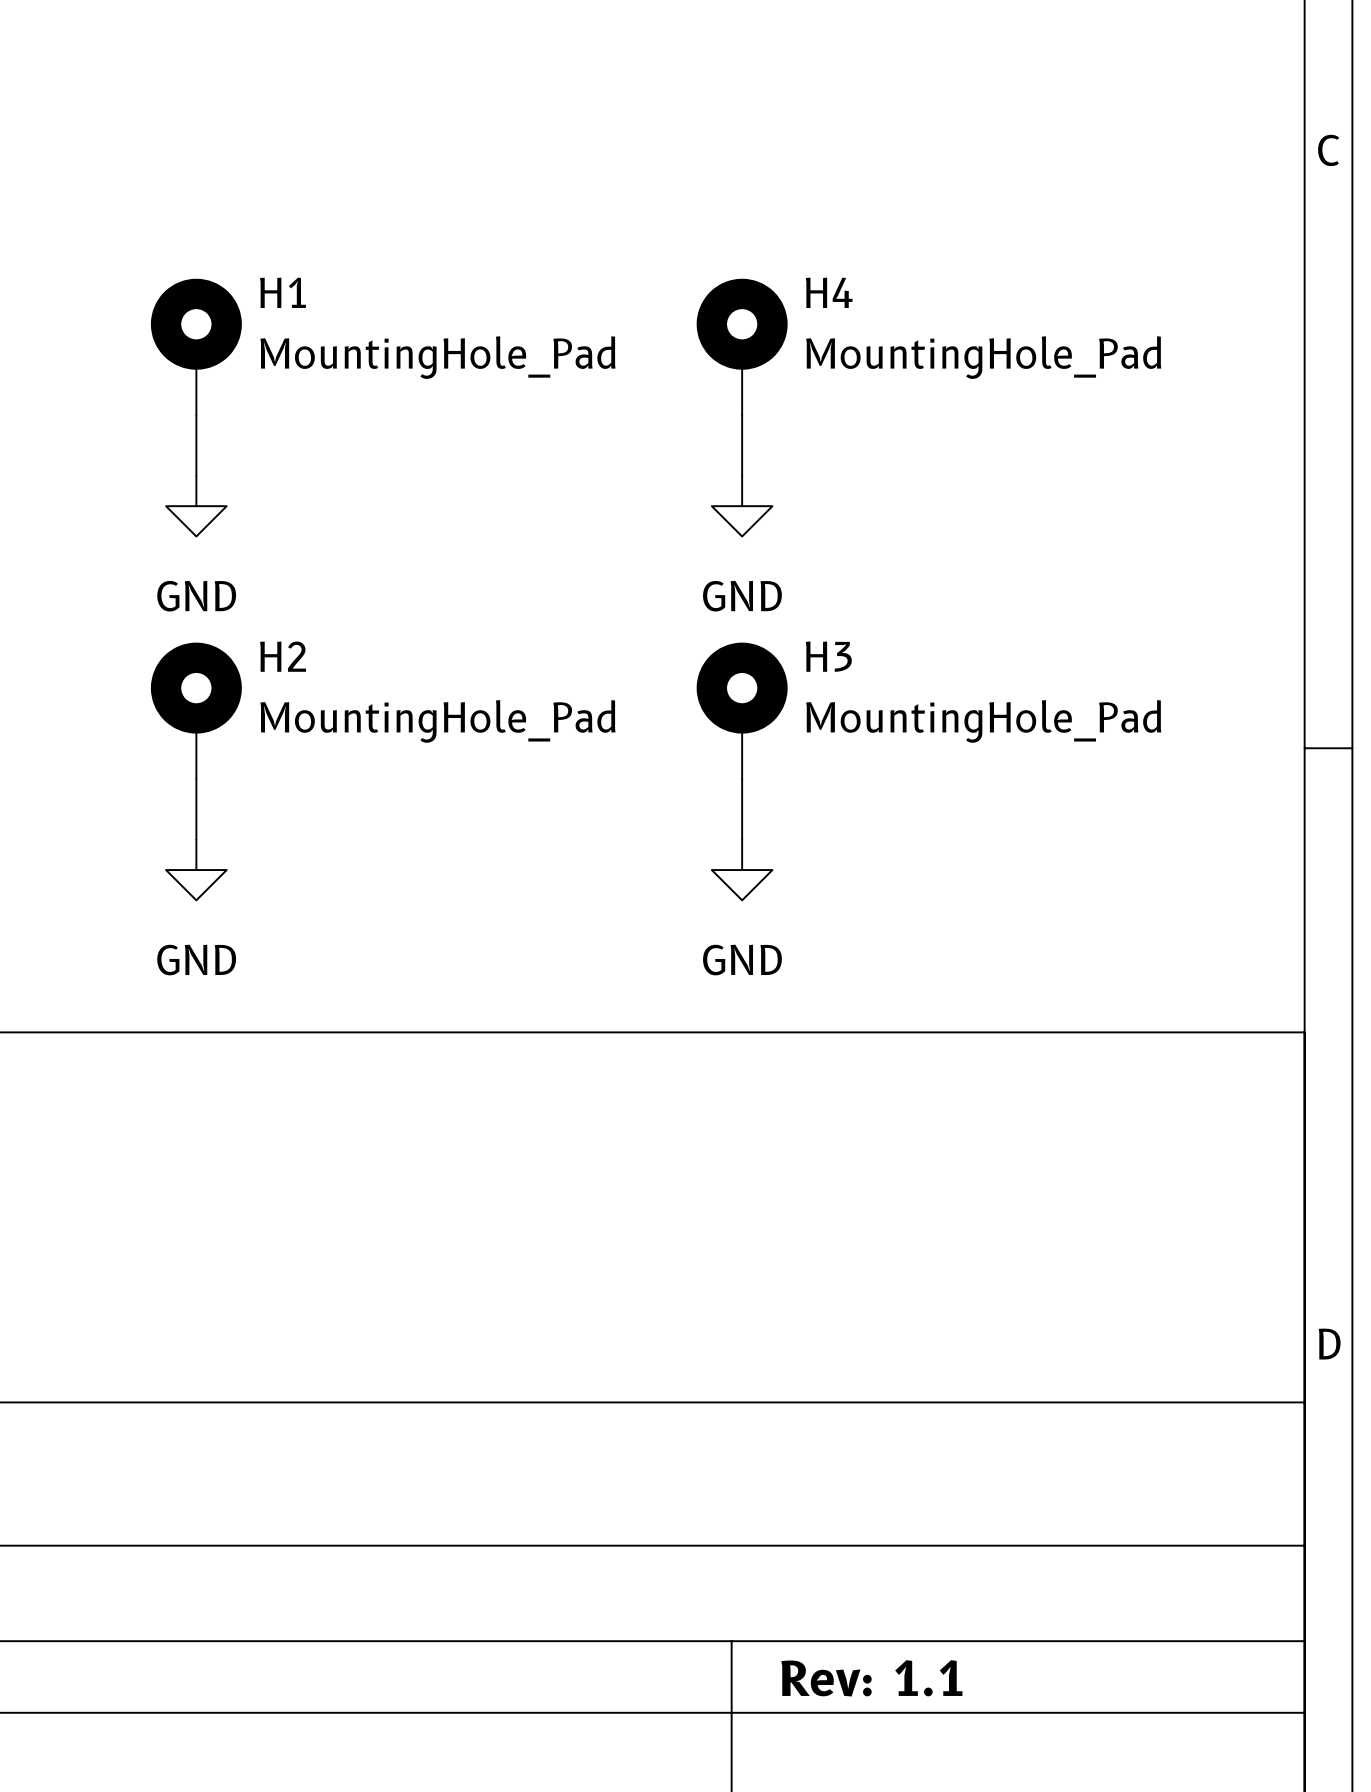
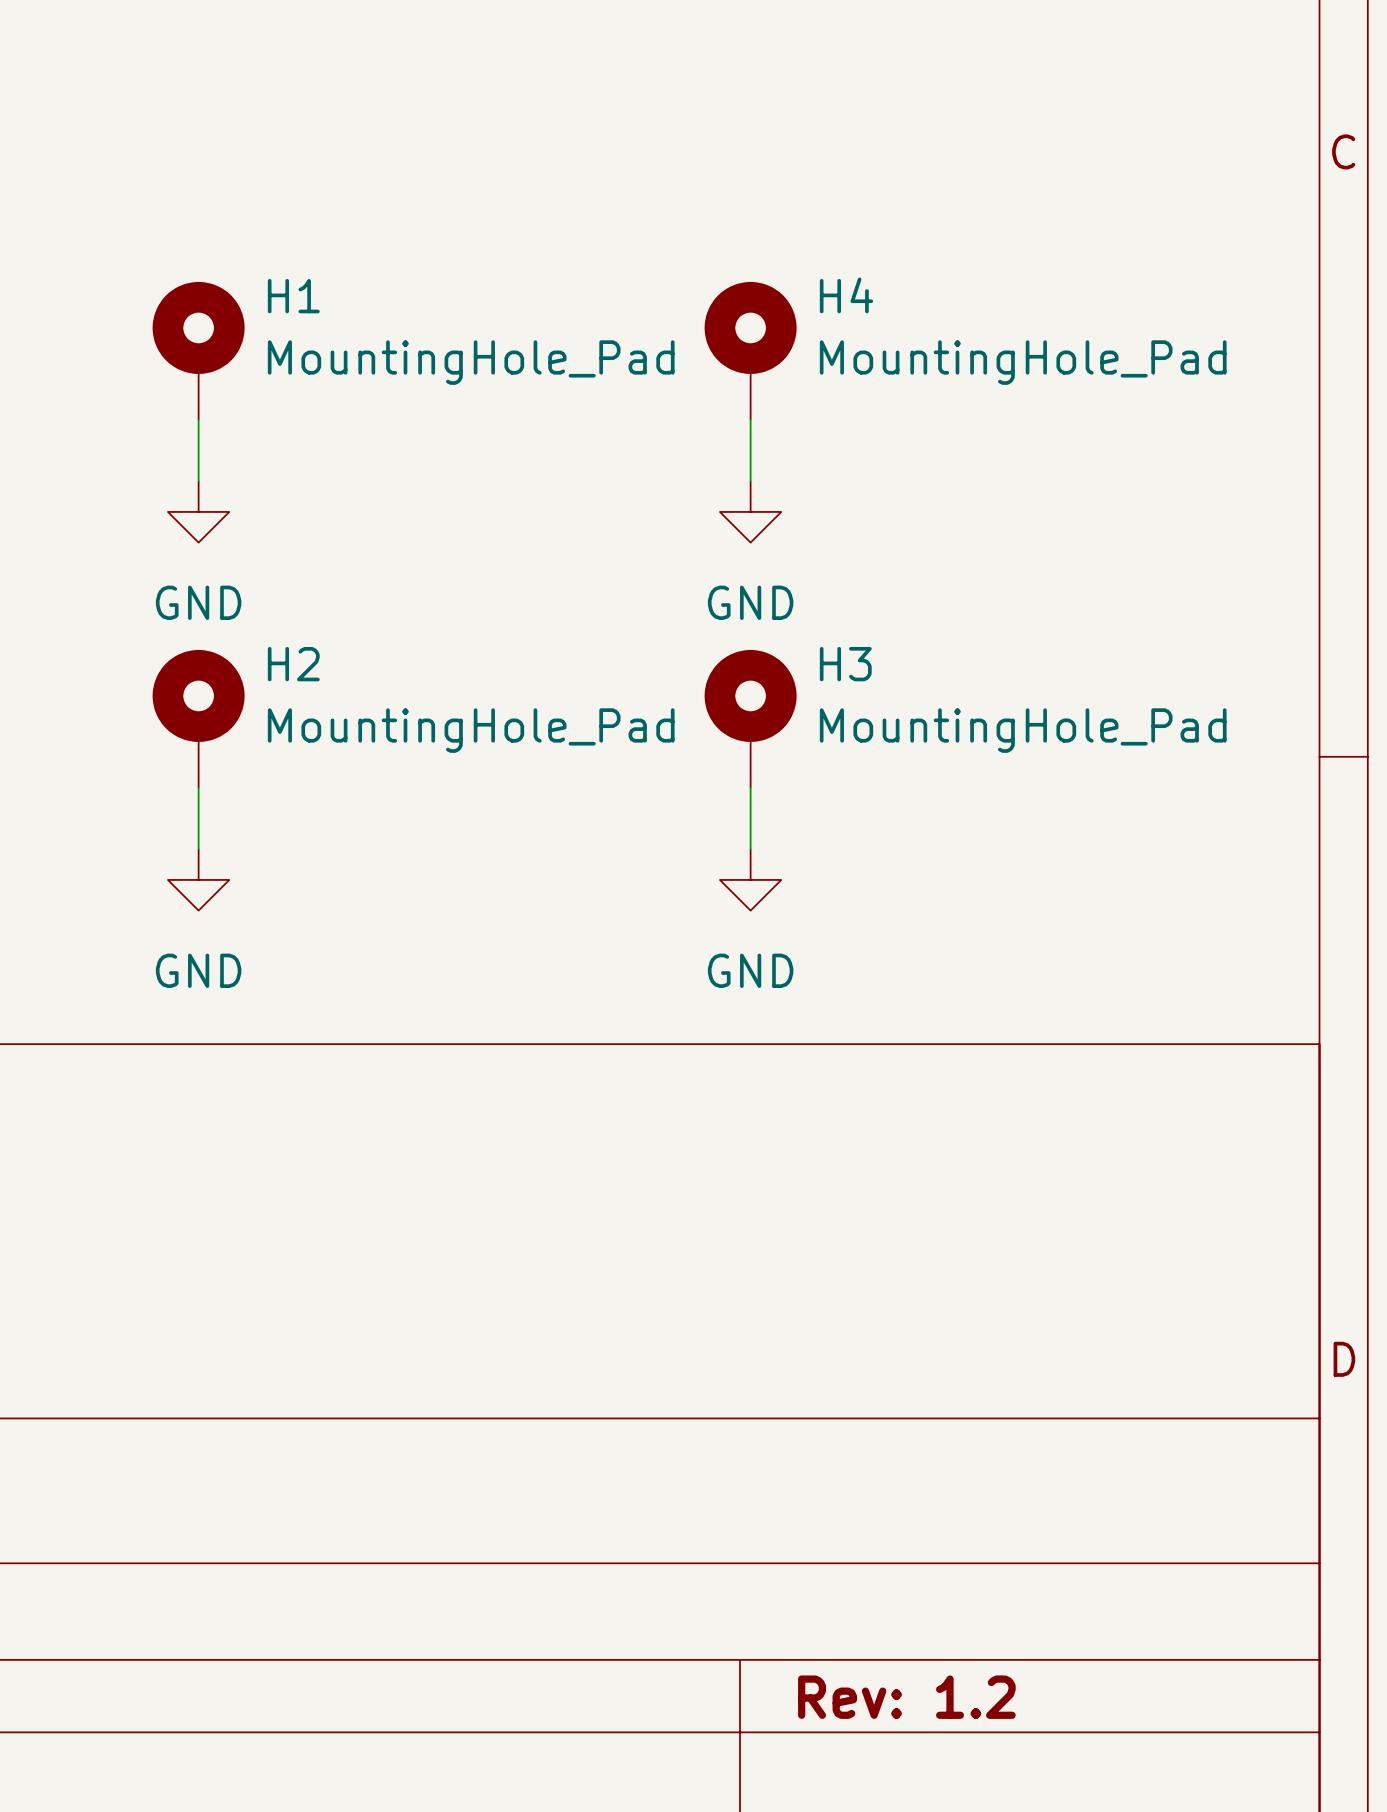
title block: Rev: 1.1 (871, 1678) -> Rev: 1.2 (906, 1697)

